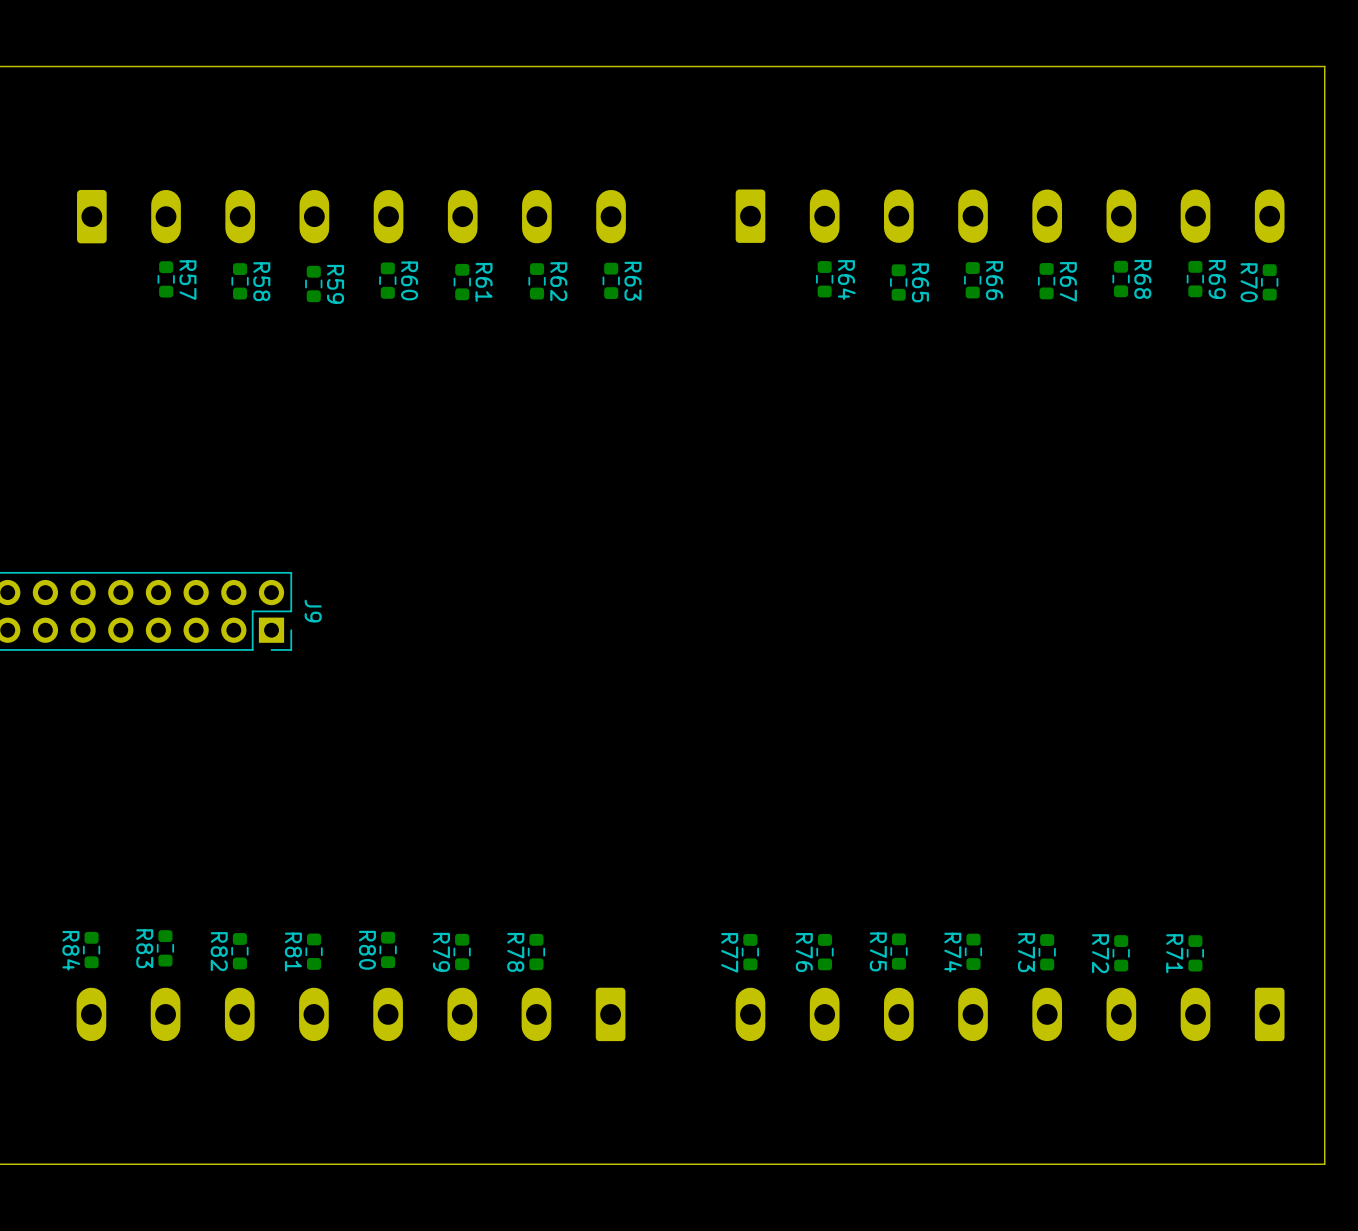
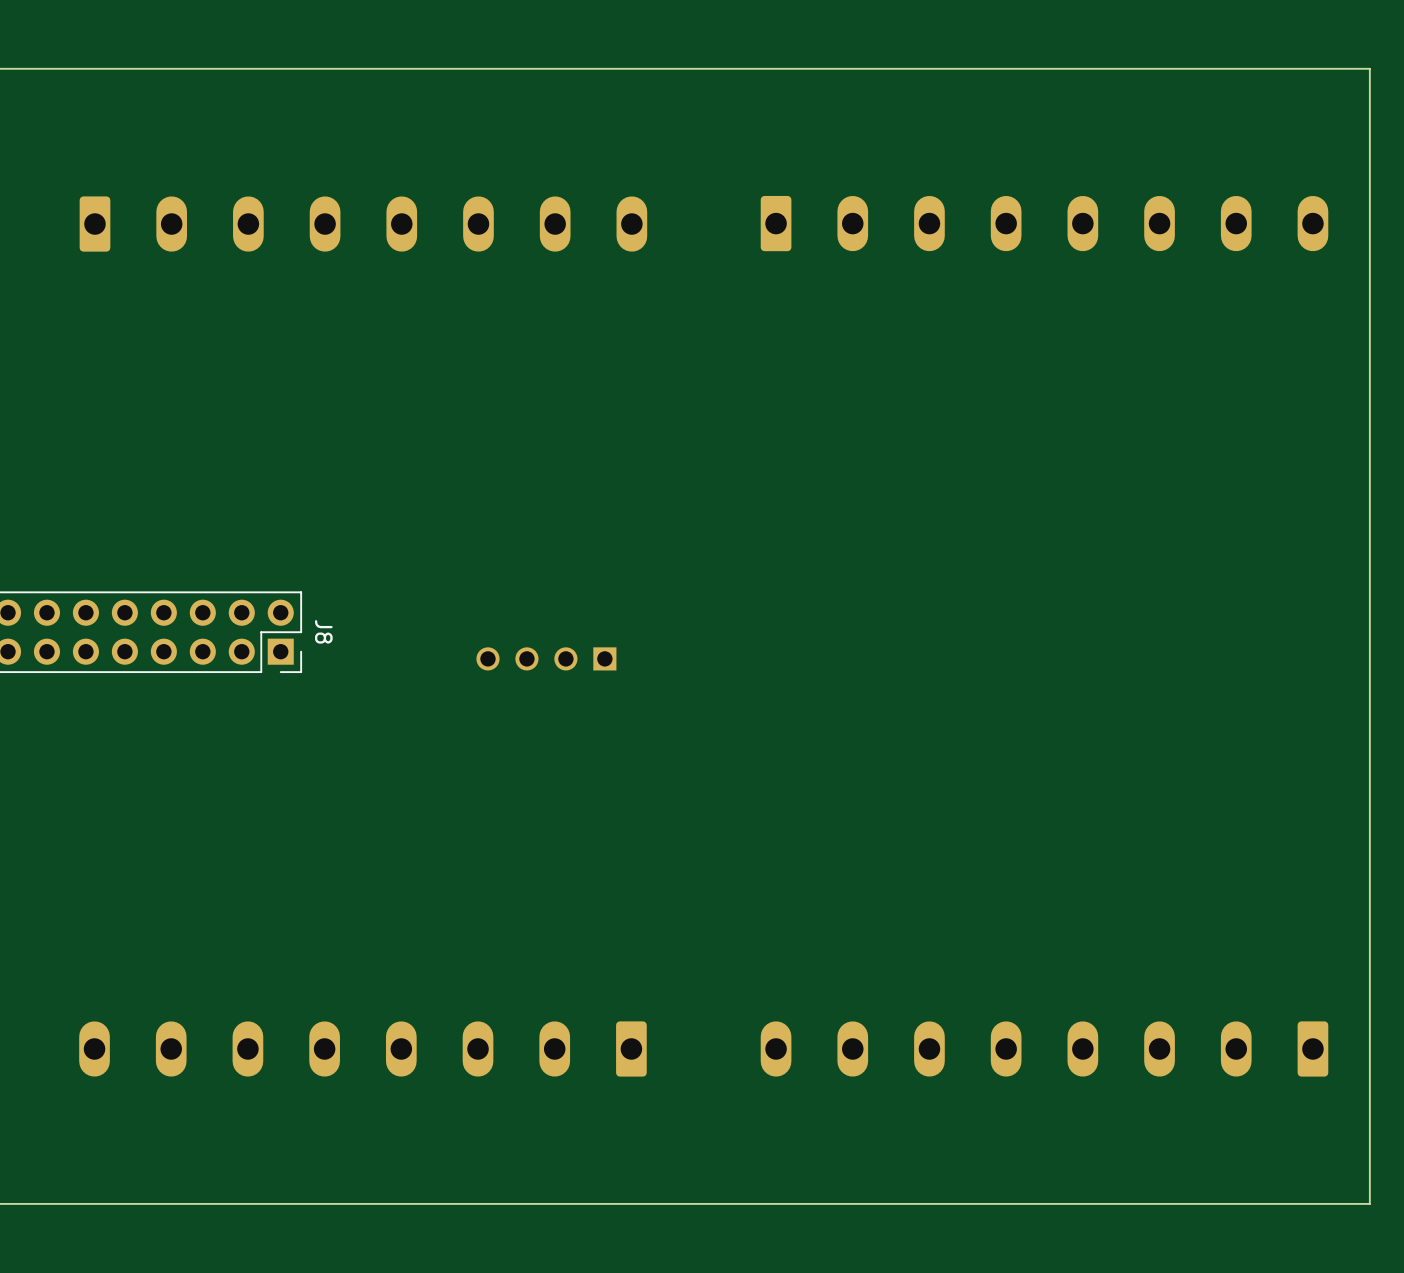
R57: (166, 279) -> none
R64: (824, 279) -> none
R68: (1121, 279) -> none
R69: (1195, 279) -> none
R60: (387, 280) -> none
R63: (611, 280) -> none
R66: (972, 280) -> none
R58: (240, 281) -> none
R62: (537, 281) -> none
R67: (1046, 281) -> none
R61: (462, 282) -> none
R65: (898, 282) -> none
R70: (1269, 282) -> none
R59: (313, 283) -> none
J9 name: J9 (313, 611) -> J8 (323, 631)
part: none -> (546, 658)
R83: (165, 948) -> none
R80: (388, 949) -> none
R84: (91, 950) -> none
R82: (239, 951) -> none
R81: (314, 951) -> none
R79: (462, 951) -> none
R75: (898, 951) -> none
R74: (973, 951) -> none
R78: (536, 952) -> none
R77: (750, 952) -> none
R76: (824, 952) -> none
R73: (1047, 952) -> none
R72: (1121, 953) -> none
R71: (1195, 953) -> none

